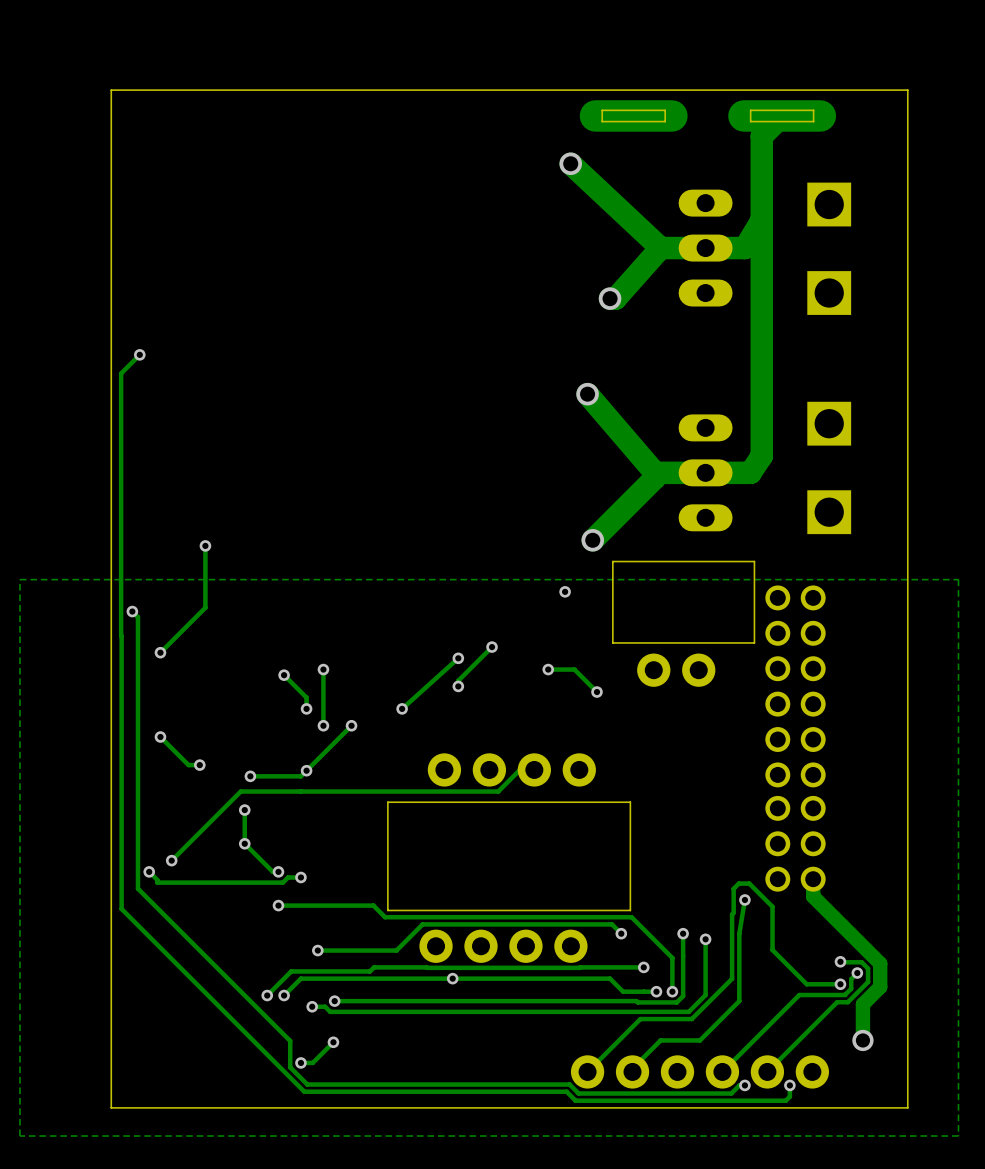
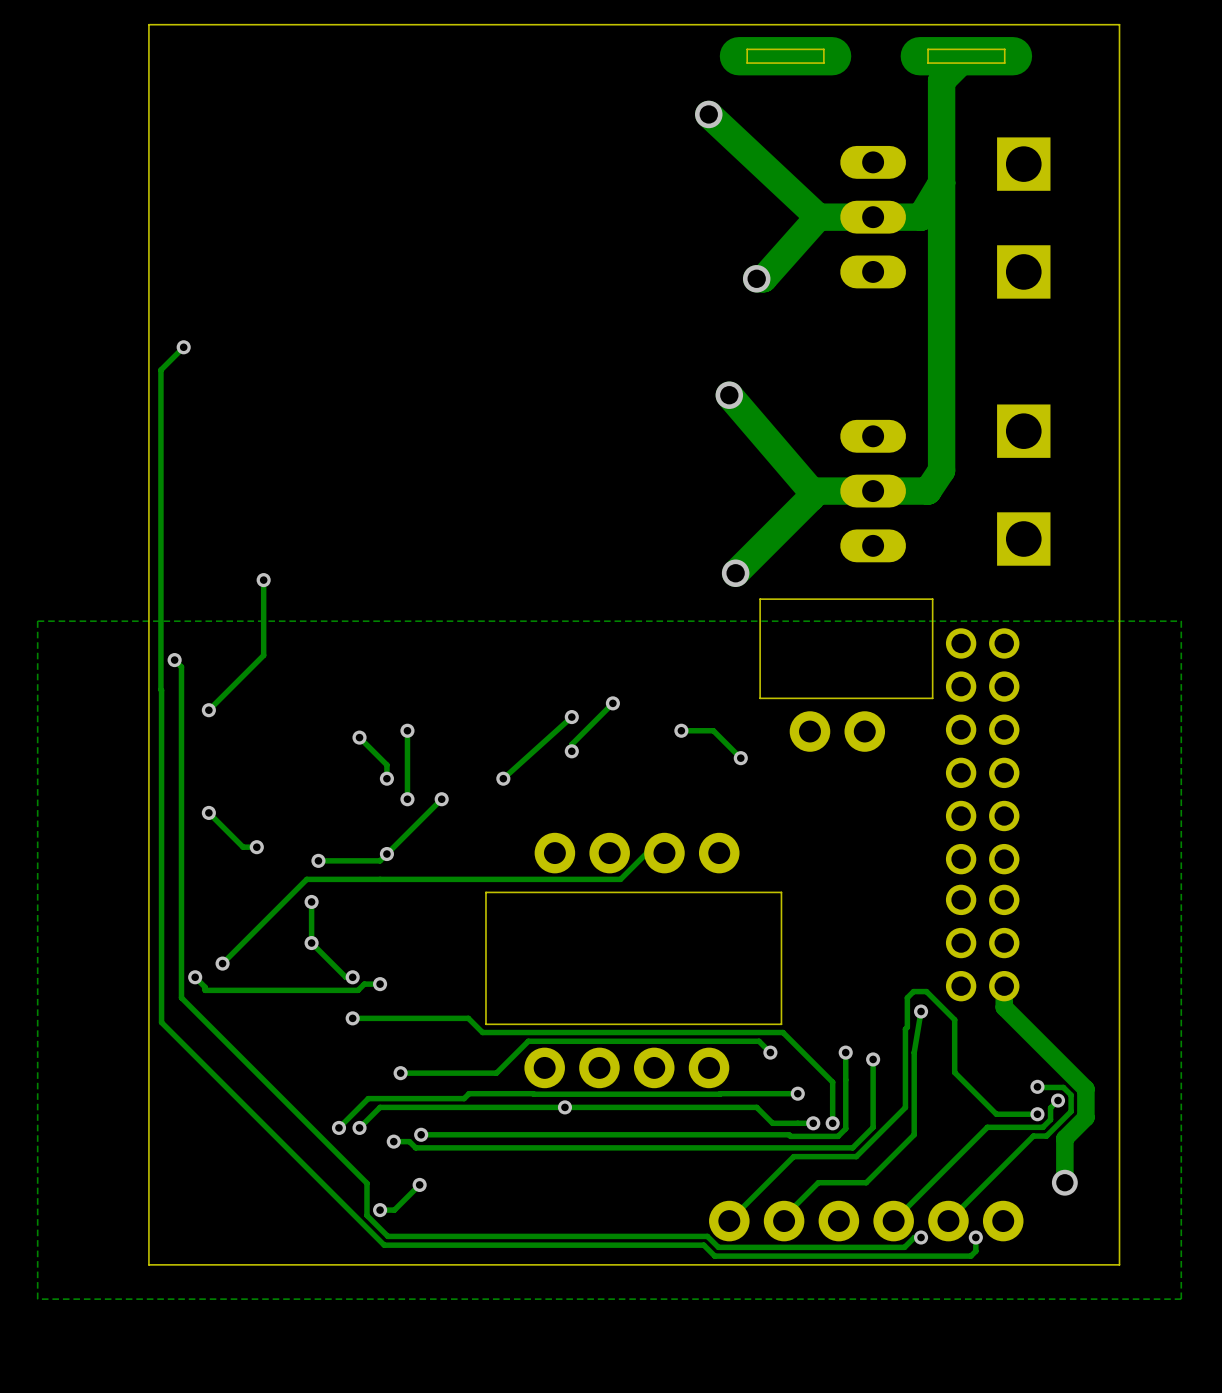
via: (565, 591) -> none

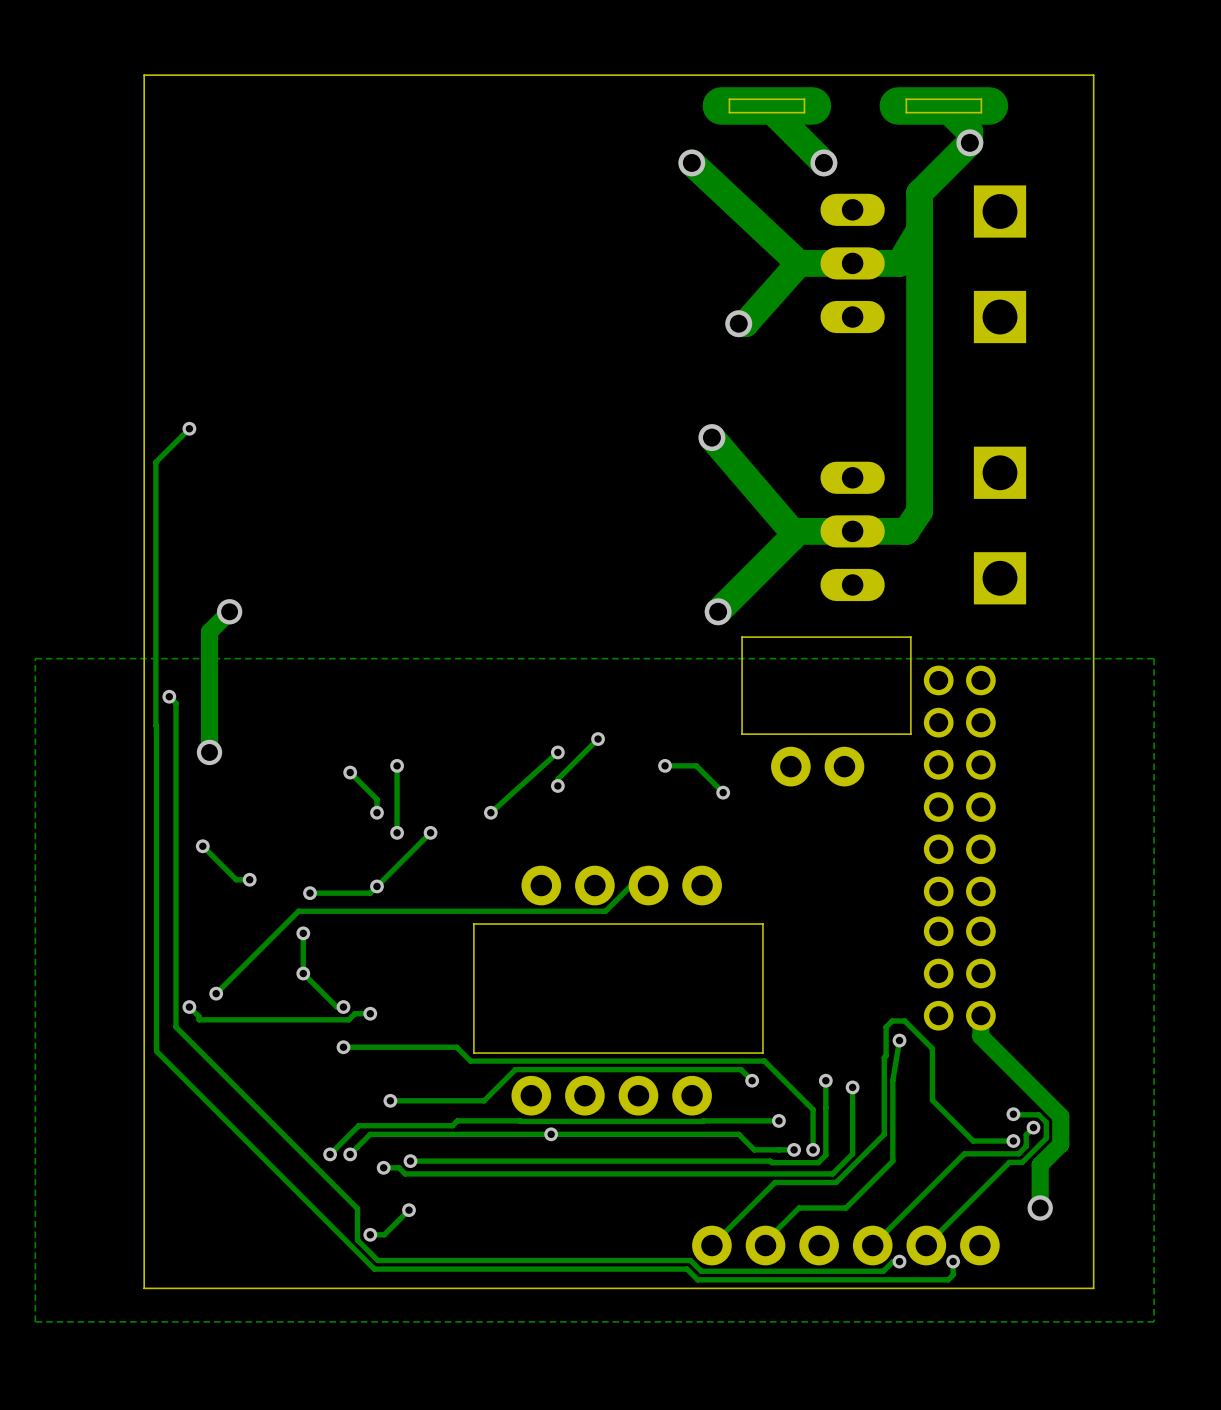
track: none -> (766, 105) (823, 162)
track: (966, 56) (941, 81) (941, 145) -> (943, 105) (969, 131) (969, 142) (919, 193)
via: none -> (969, 142)
via: none -> (823, 162)
track: (183, 347) (160, 370) (160, 420) -> (189, 428) (155, 462)
via position: (183, 347) -> (189, 428)
track: none -> (229, 611) (209, 631) (209, 752)
via: none -> (229, 611)
track: (263, 580) (263, 655) (208, 710) -> none
via: (263, 580) -> none
via size: [201, 703, 216, 718] -> [196, 739, 223, 766]

